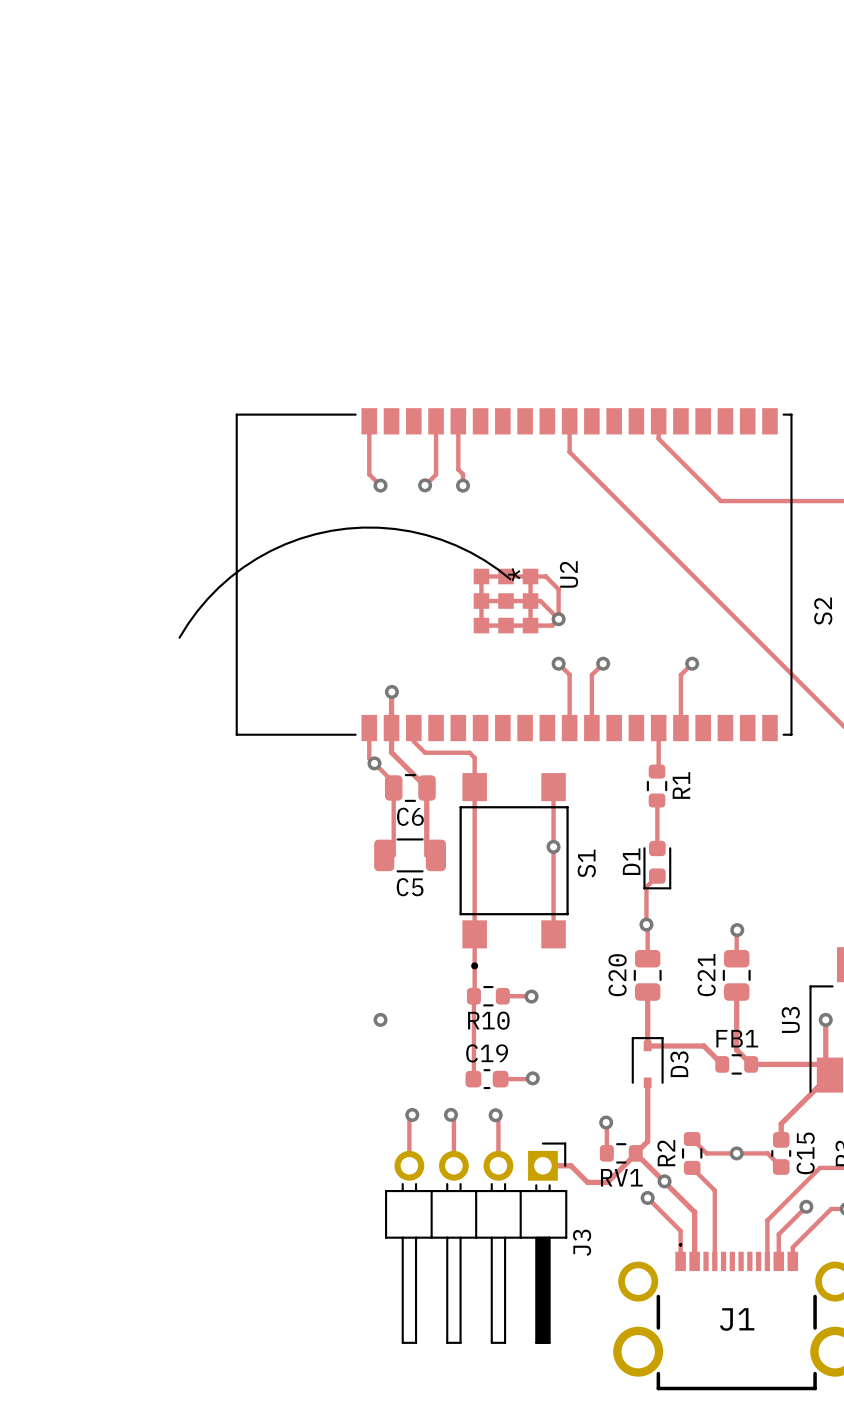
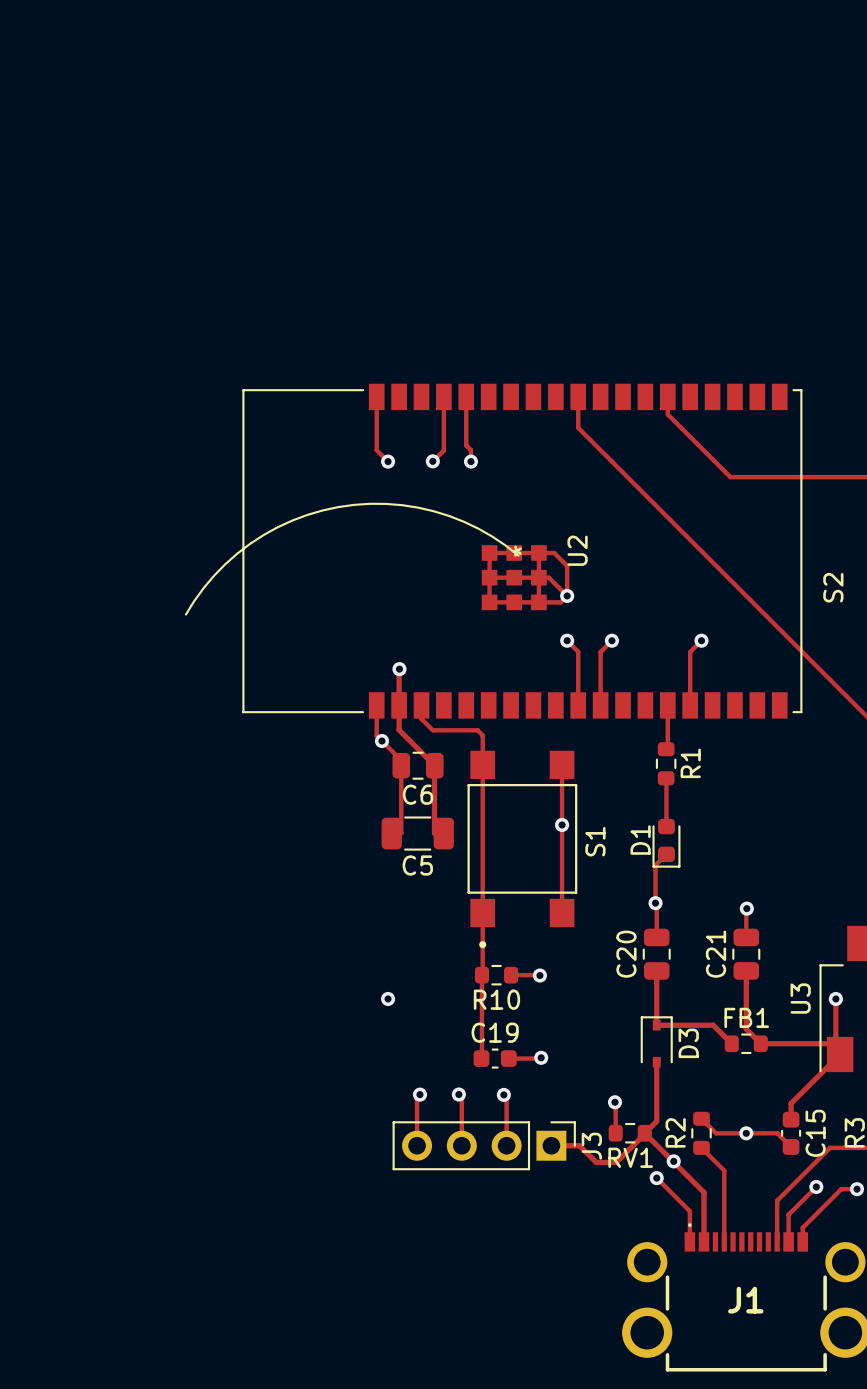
J3 footprint: [385, 1142, 568, 1344] -> [392, 1121, 576, 1171]

